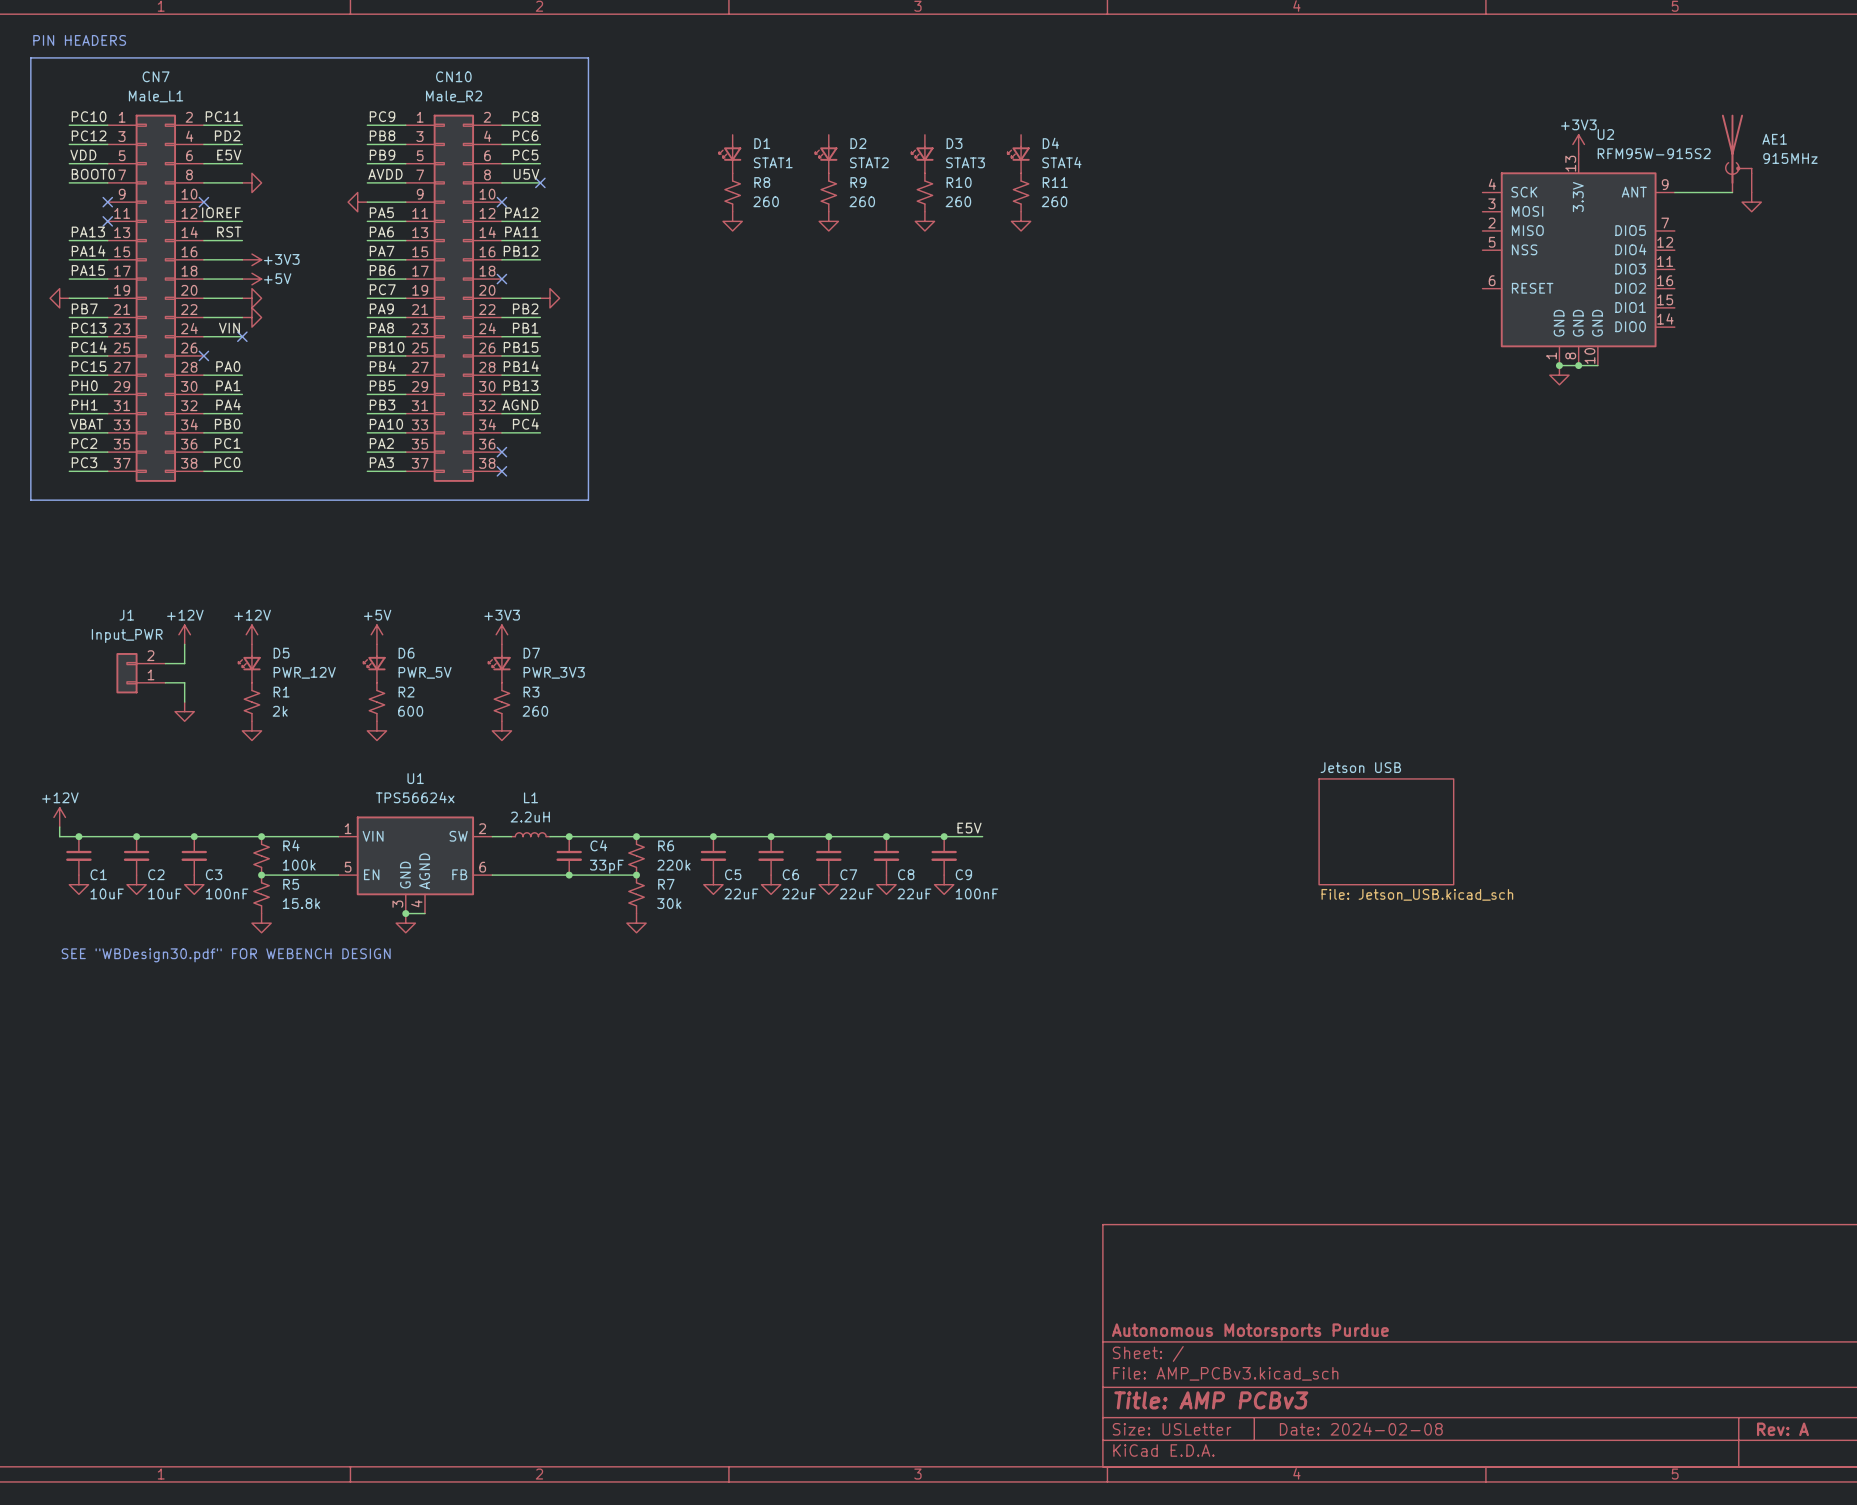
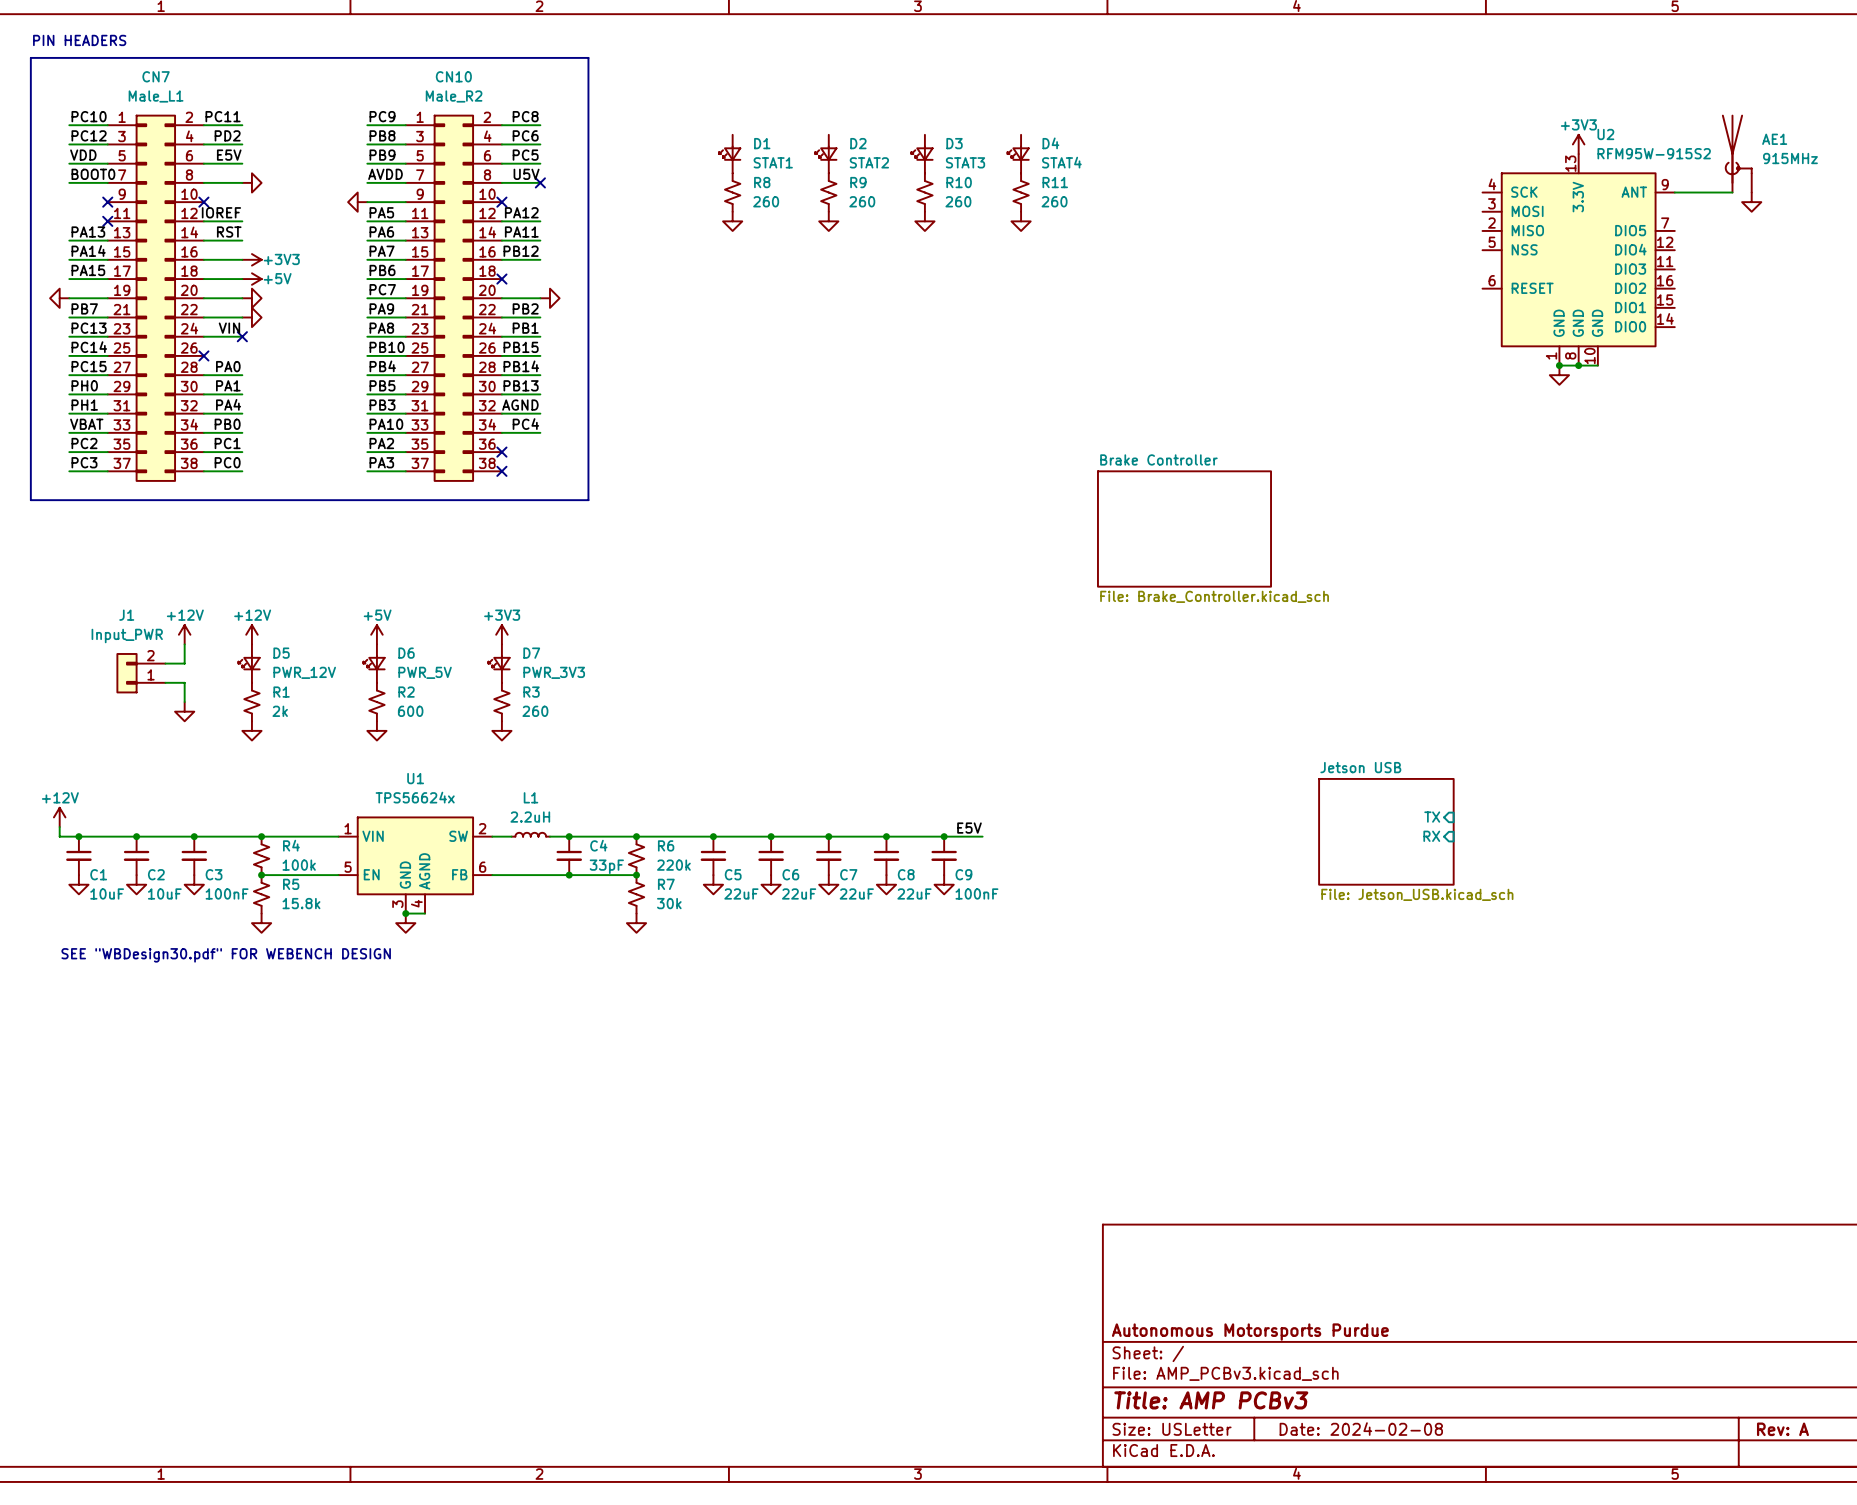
sheet Brake Controller: none -> File: Brake_Controller.kicad_sch (1184, 529)
sheet pin: none -> TX (1432, 817)
sheet pin: none -> RX (1431, 836)

